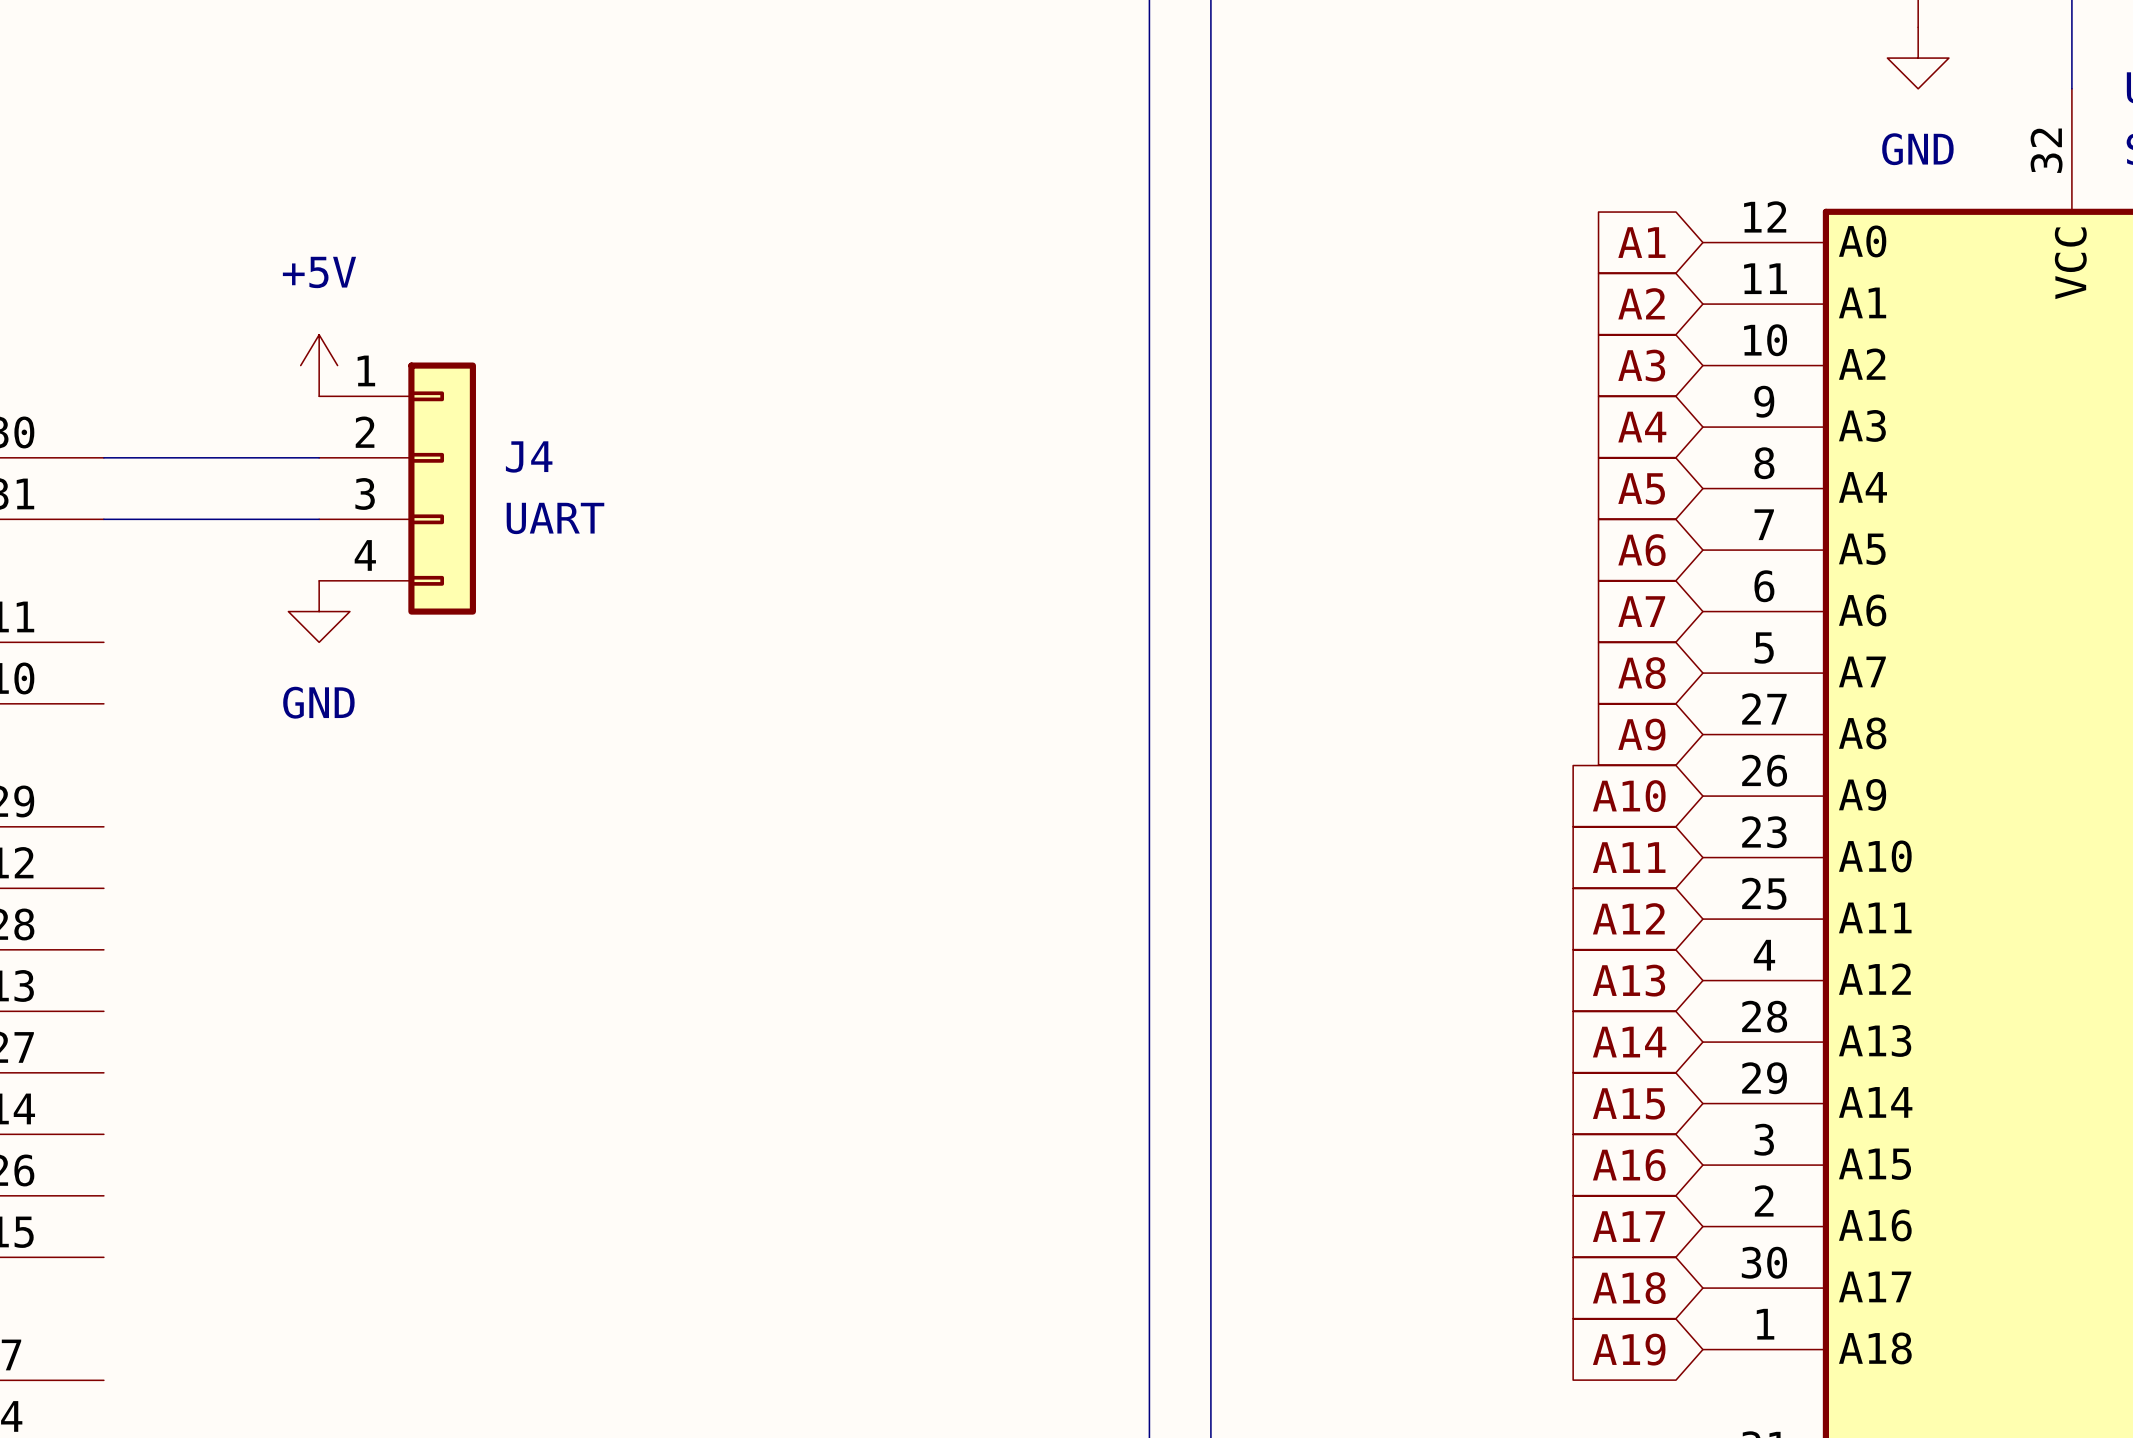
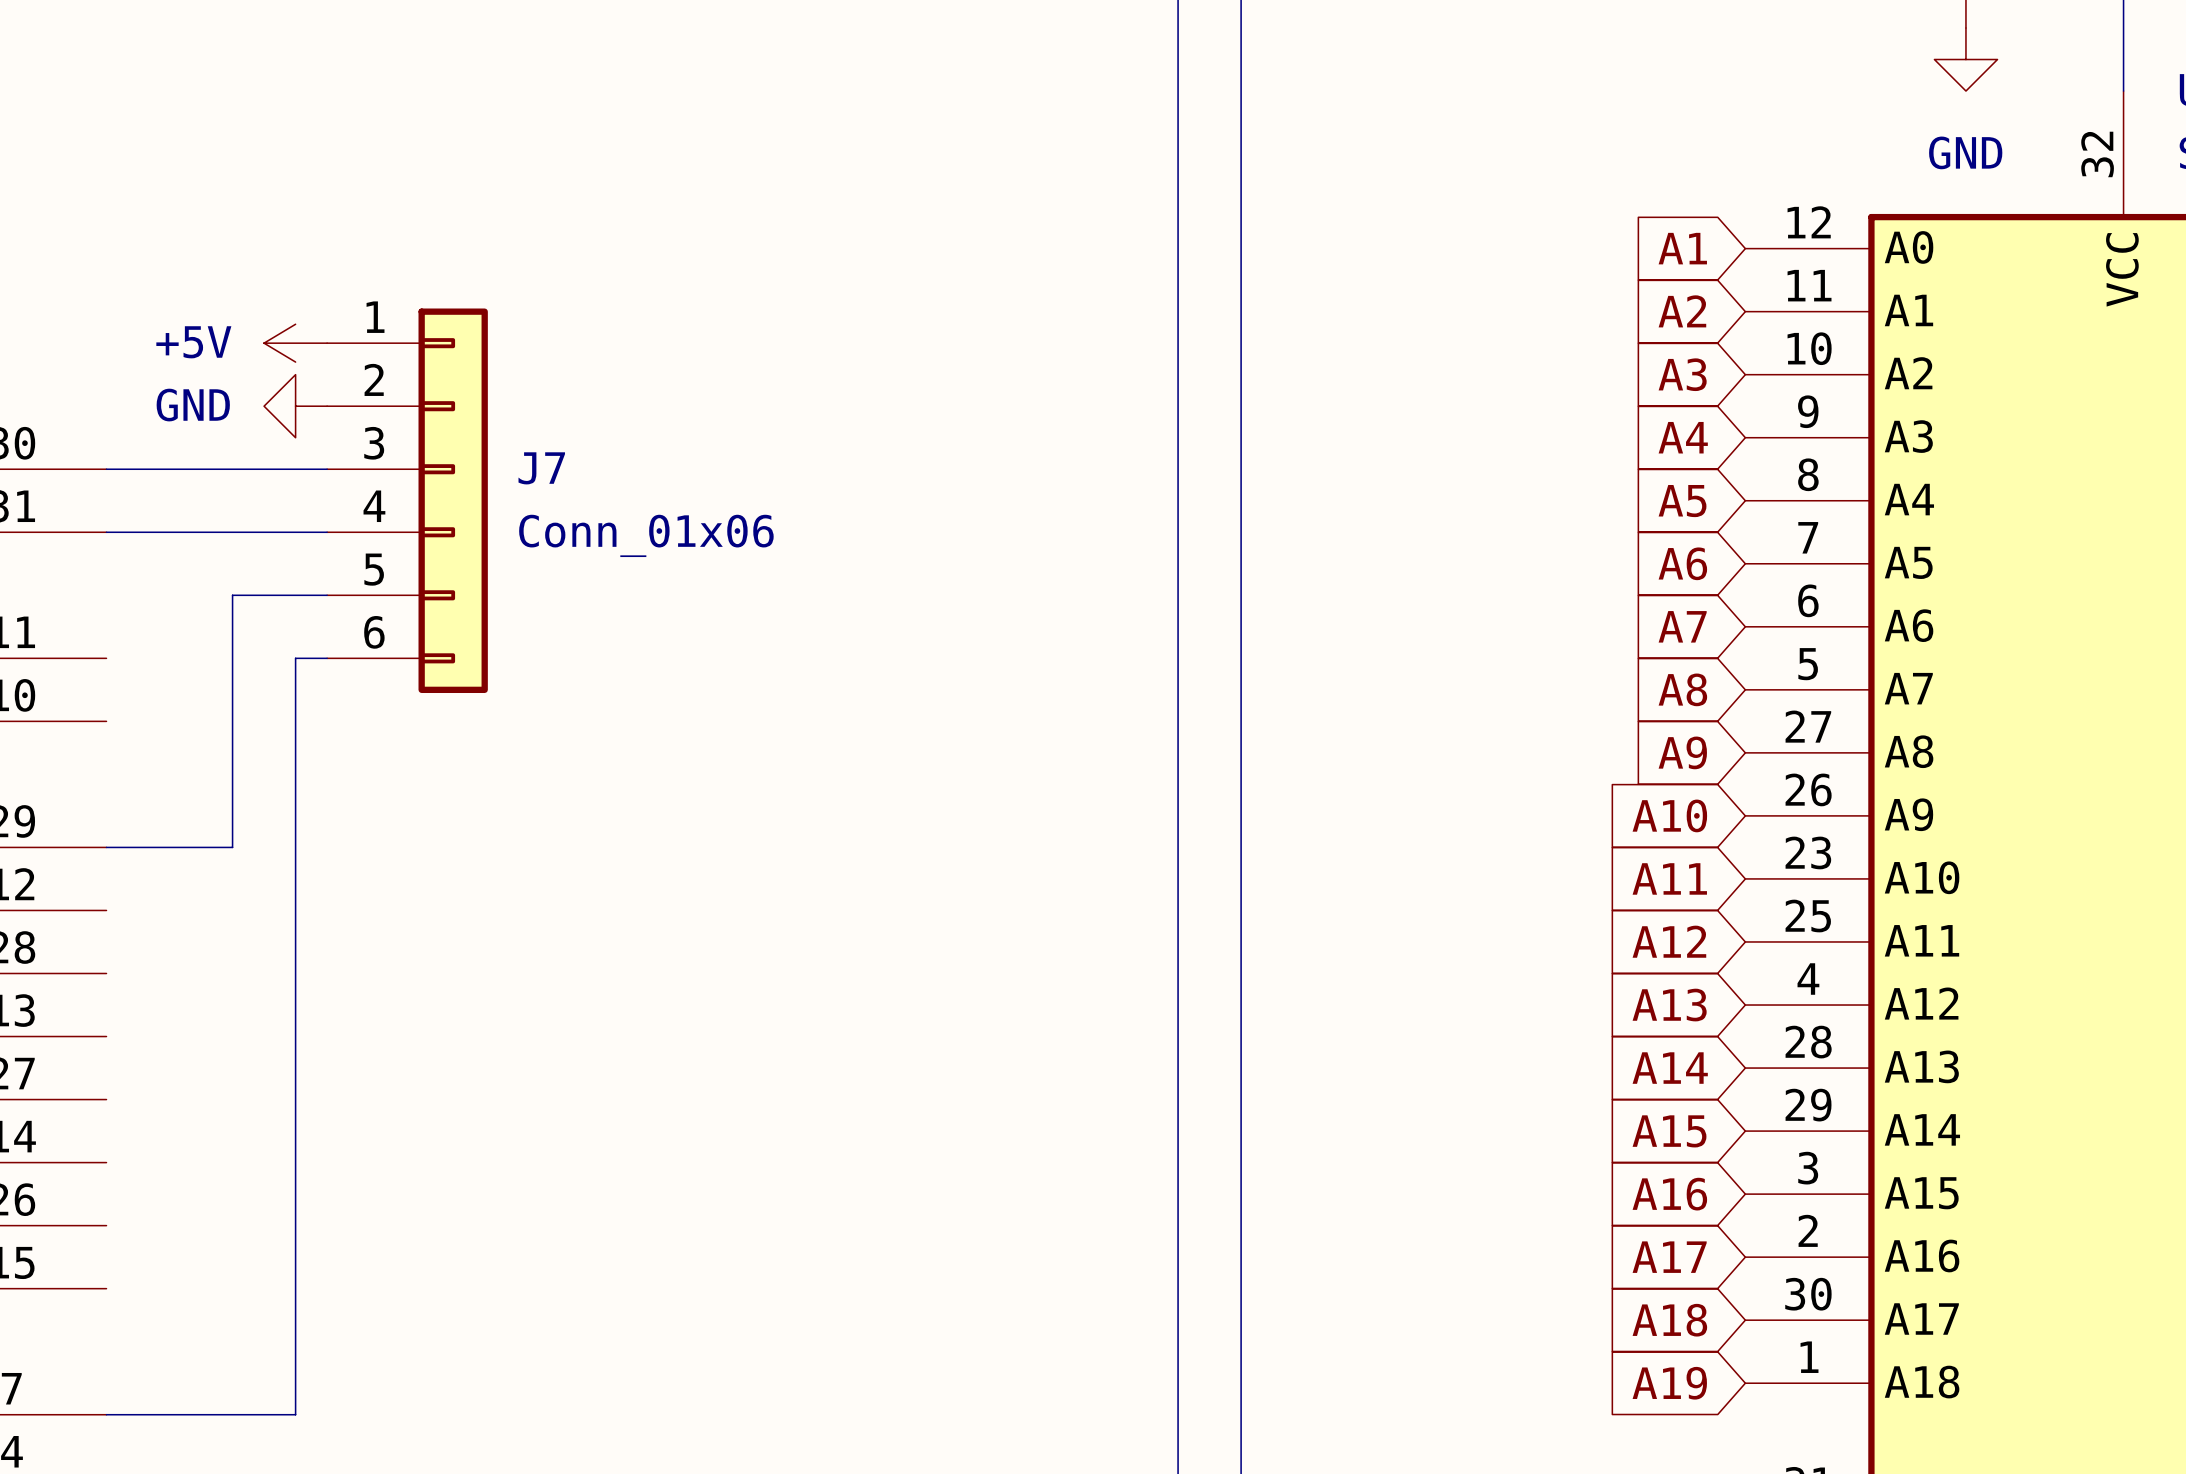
power symbol rotation: 0° (319, 365) -> 90° counterclockwise (295, 343)
power symbol position: +5V (319, 365) -> +5V (295, 343)
J4: UART (397, 488) -> none
J7: none -> Conn_01x06 (407, 500)
wire: none -> (327, 595) (232, 595) (232, 847) (106, 847)
power symbol rotation: 0° (319, 611) -> 90° clockwise (295, 406)
power symbol position: GND (319, 611) -> GND (295, 406)
wire: none -> (327, 658) (295, 658) (295, 1414) (106, 1414)

